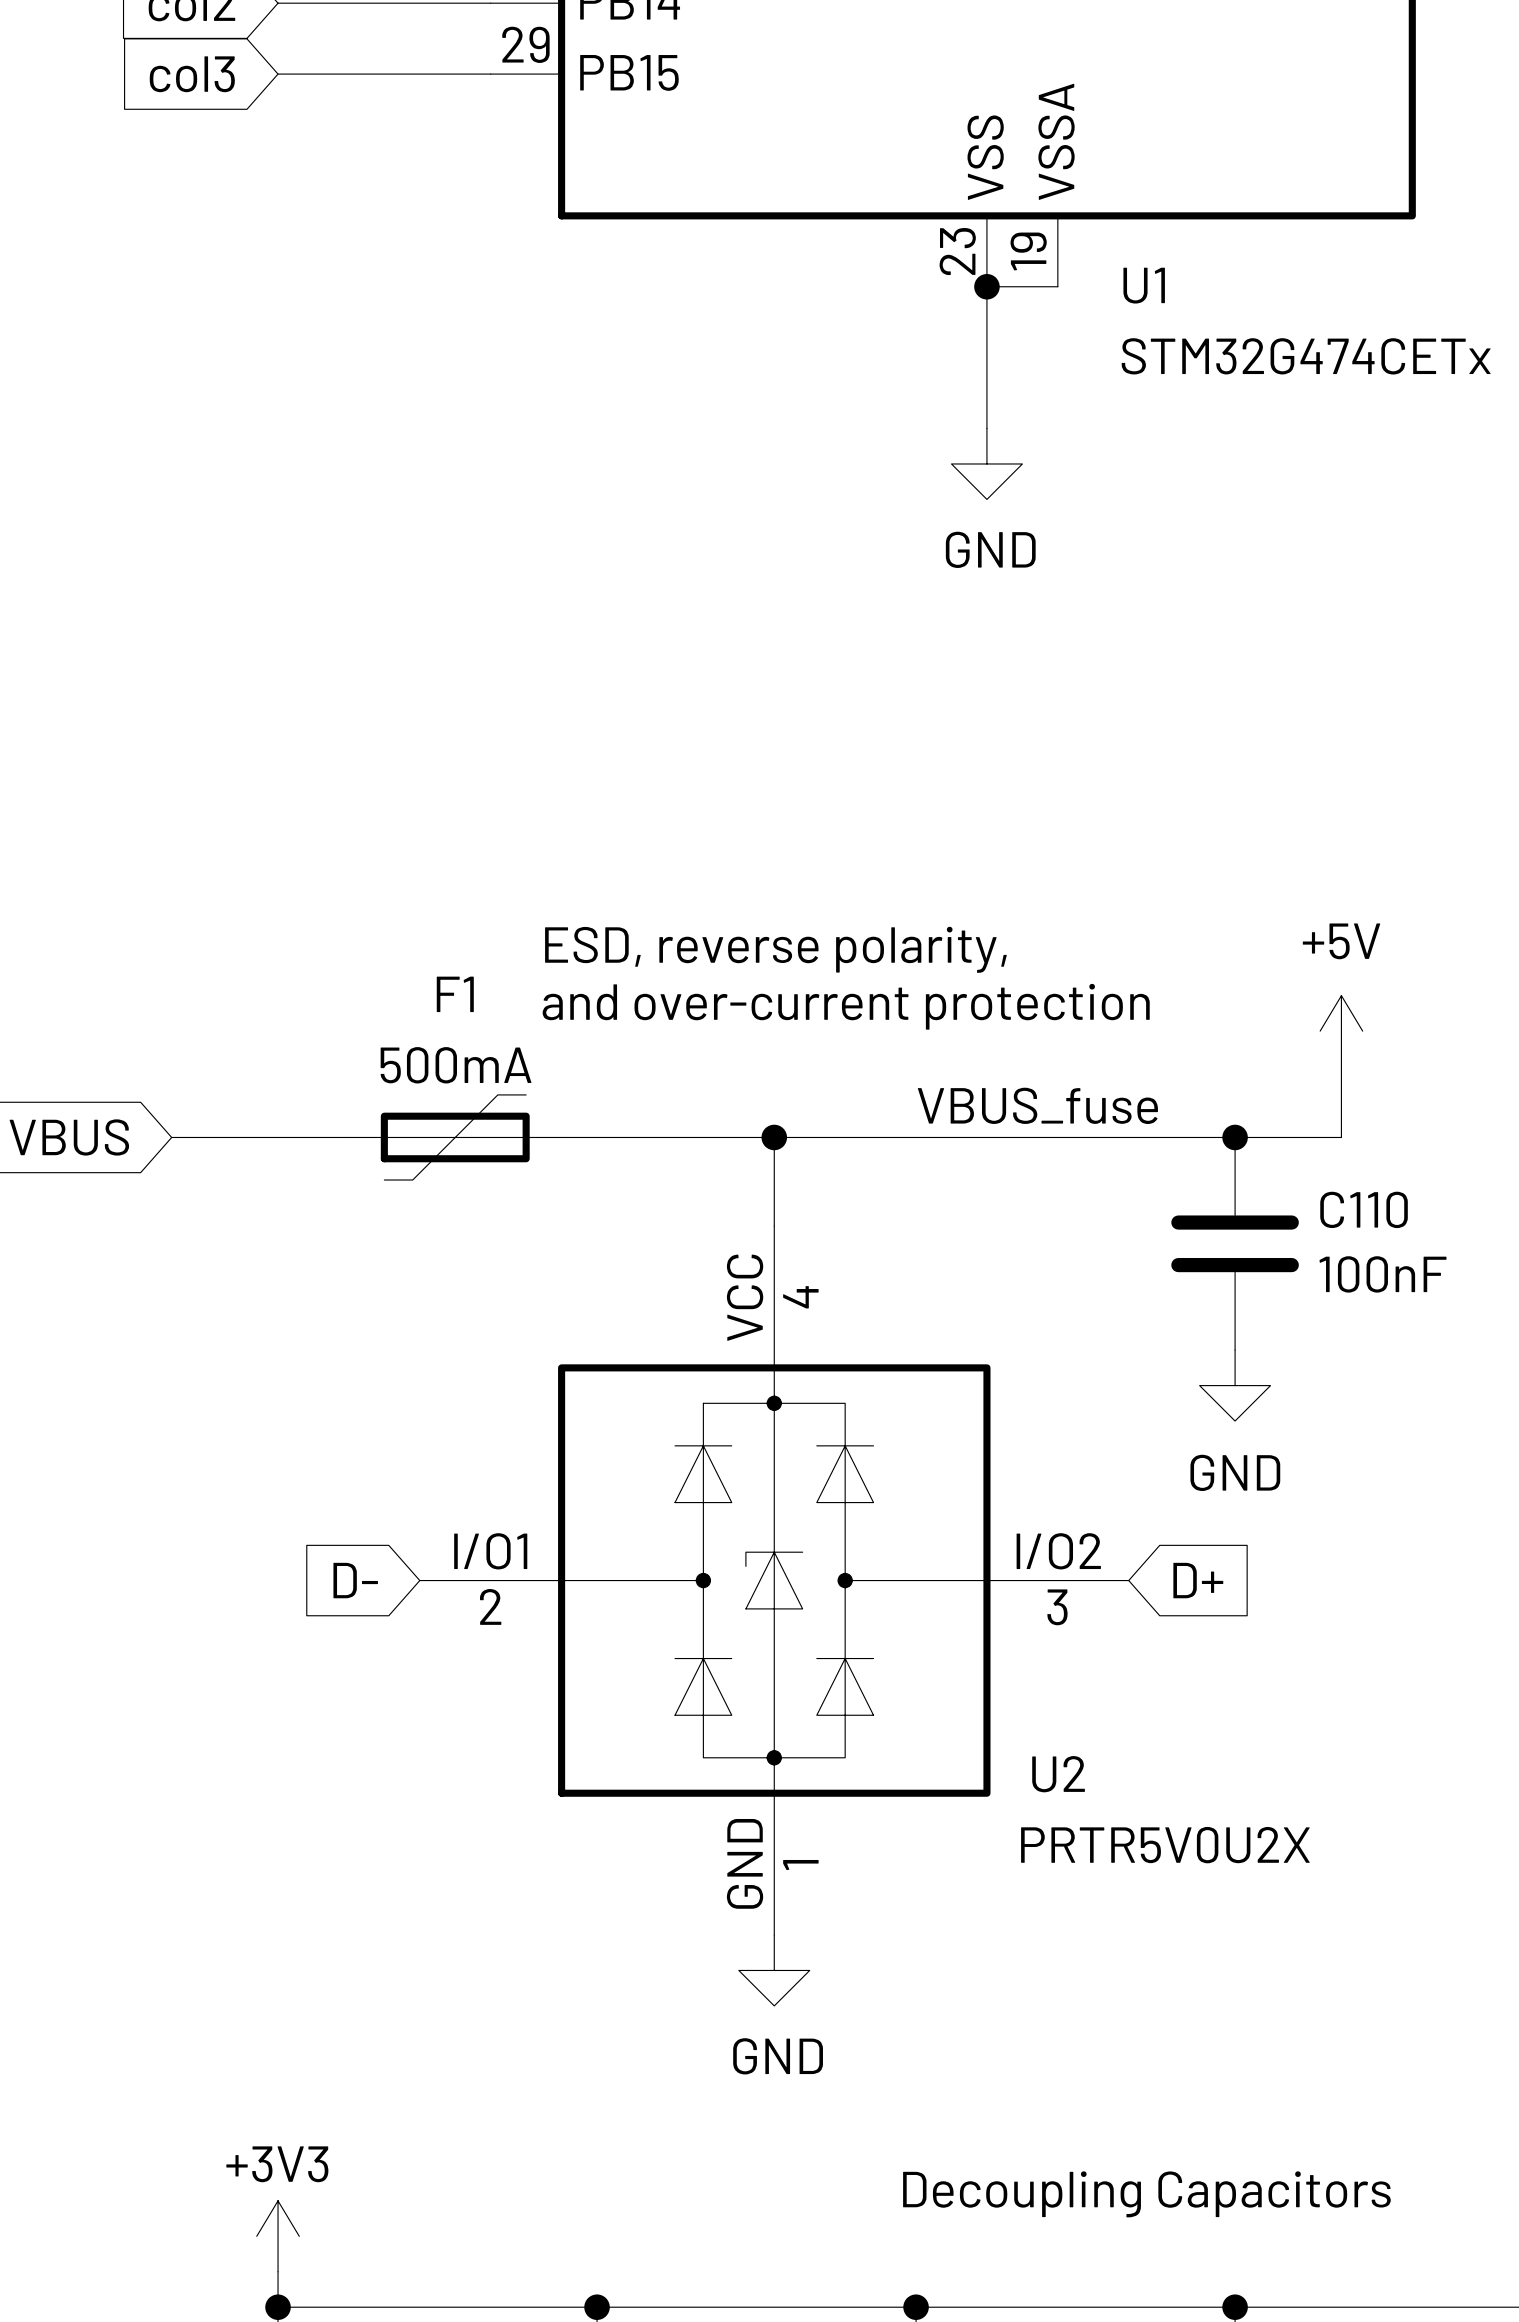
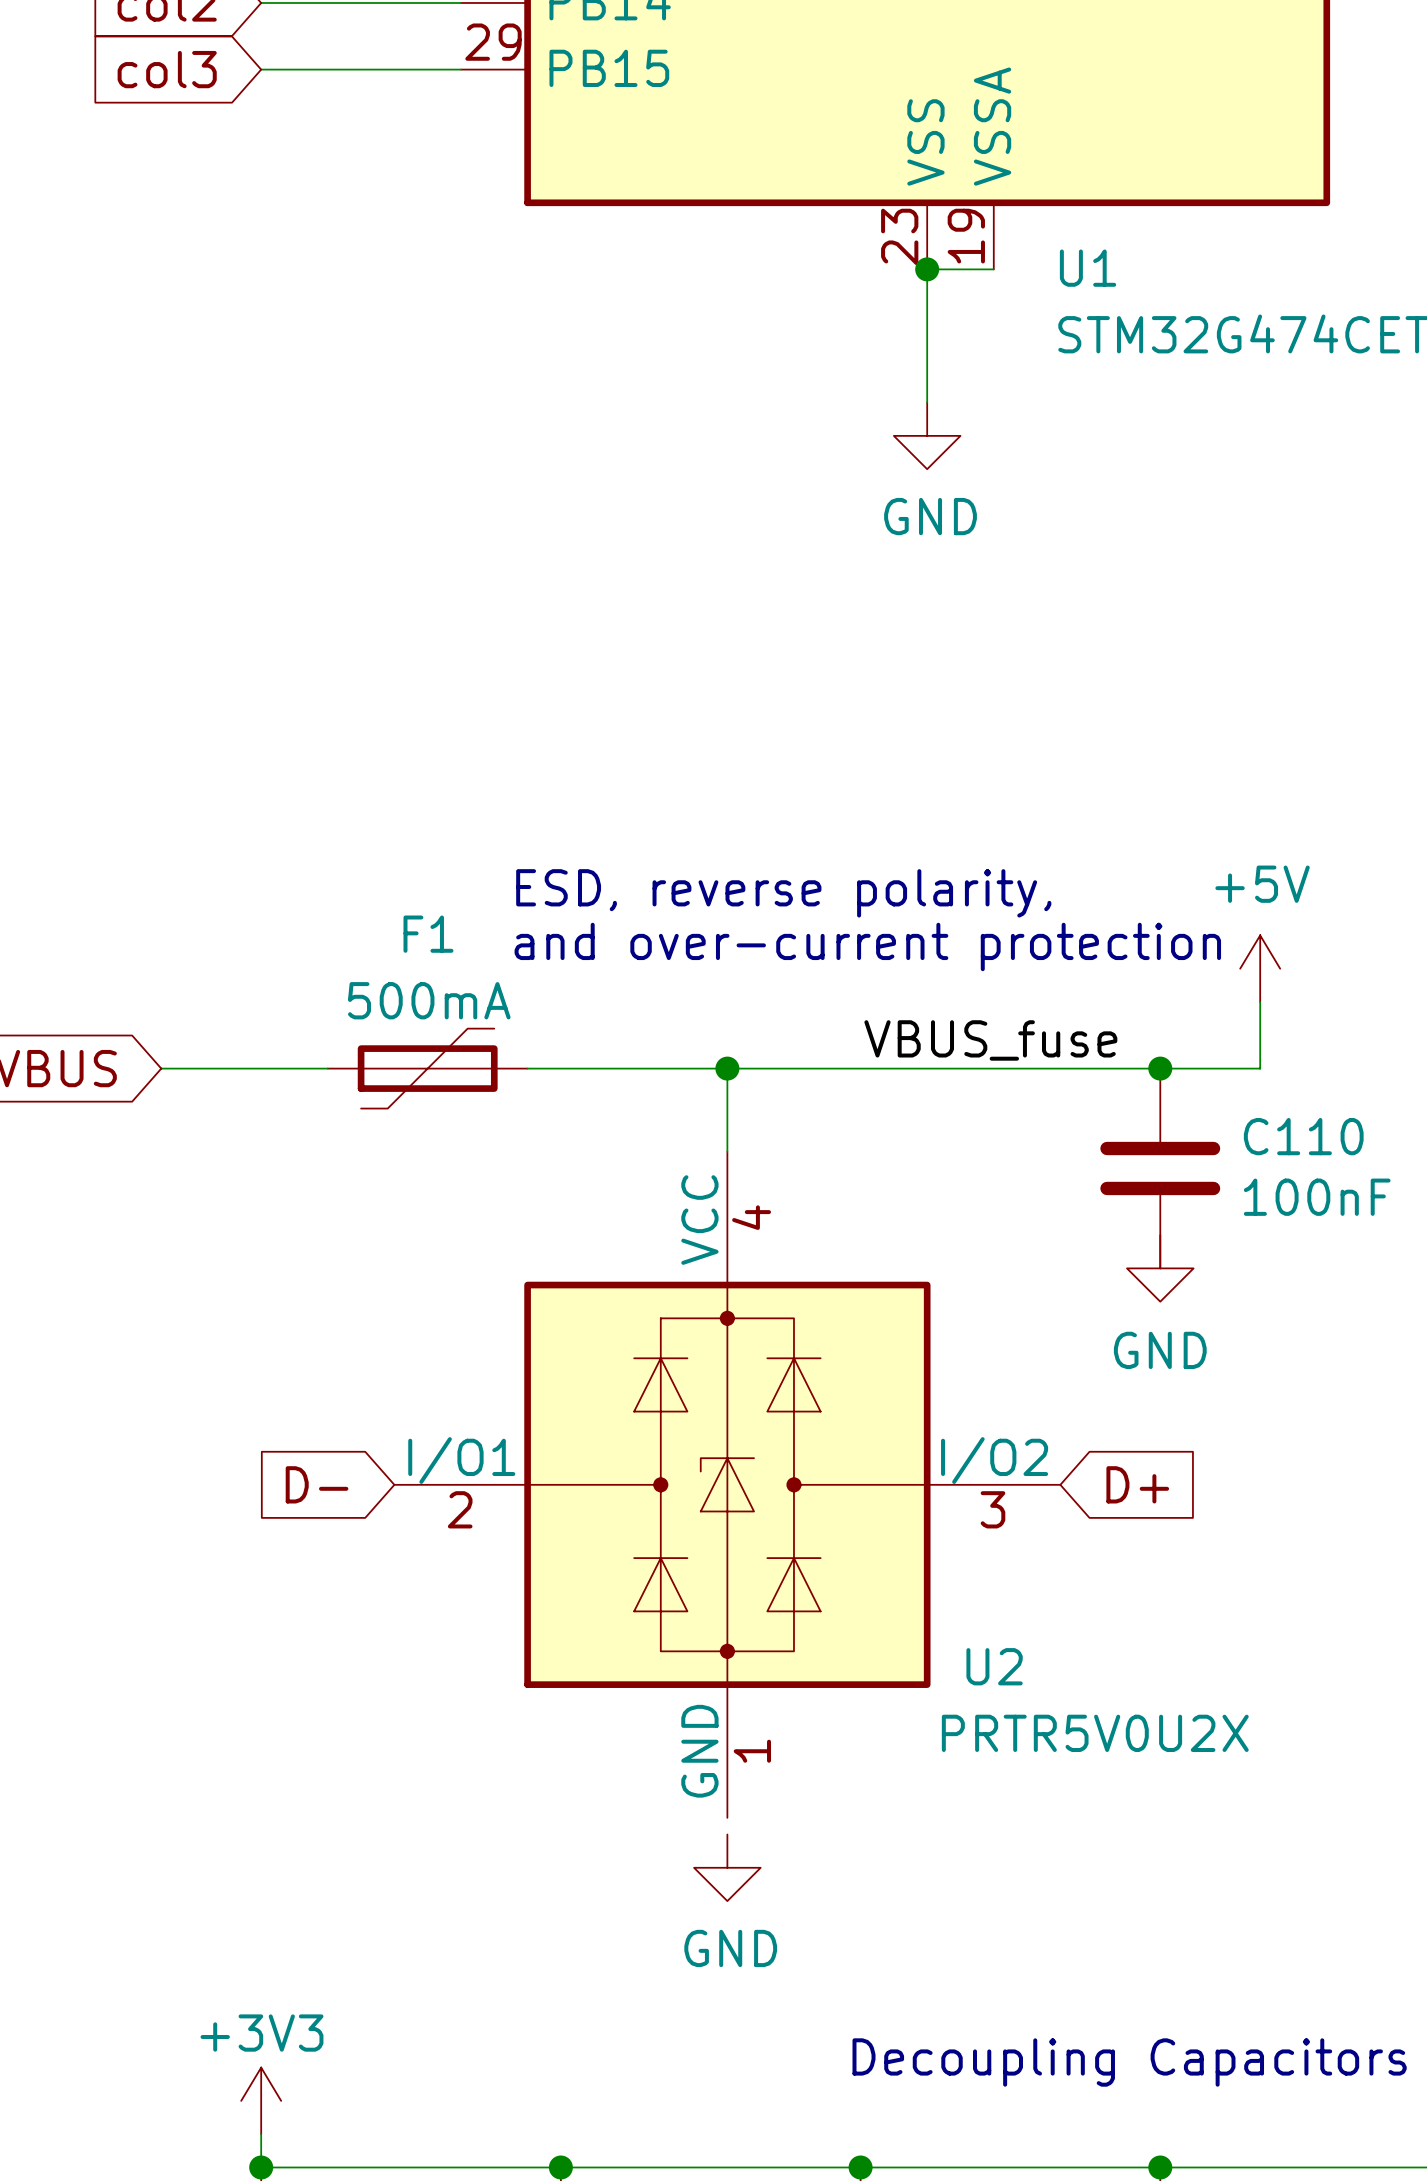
power symbol position: GND (1235, 1385) -> GND (1160, 1268)
power symbol position: GND (774, 1970) -> GND (727, 1867)

